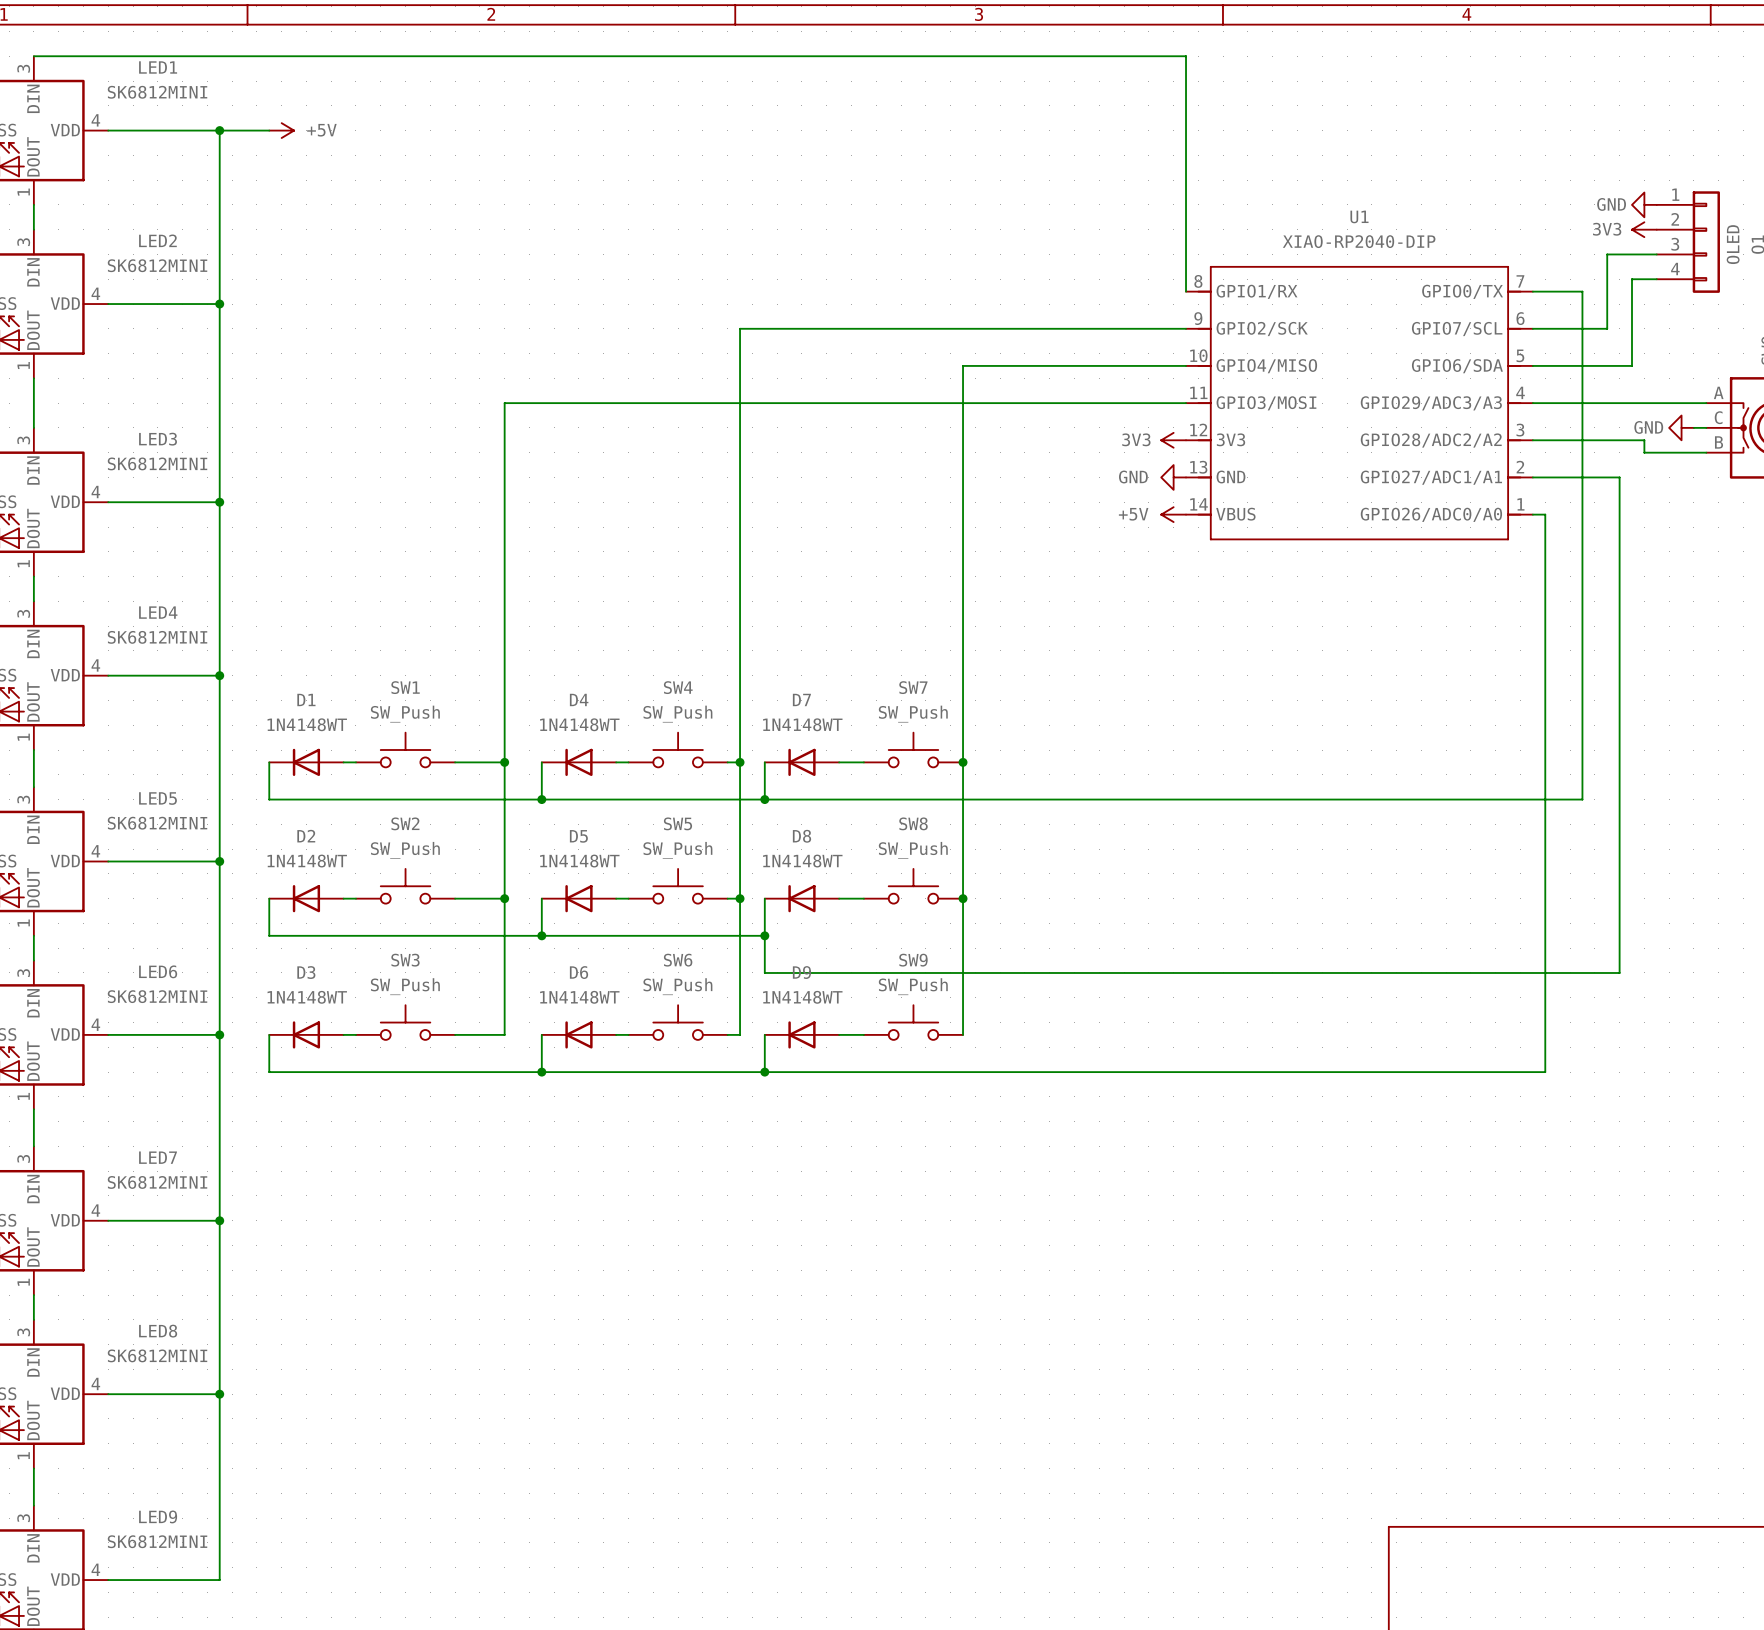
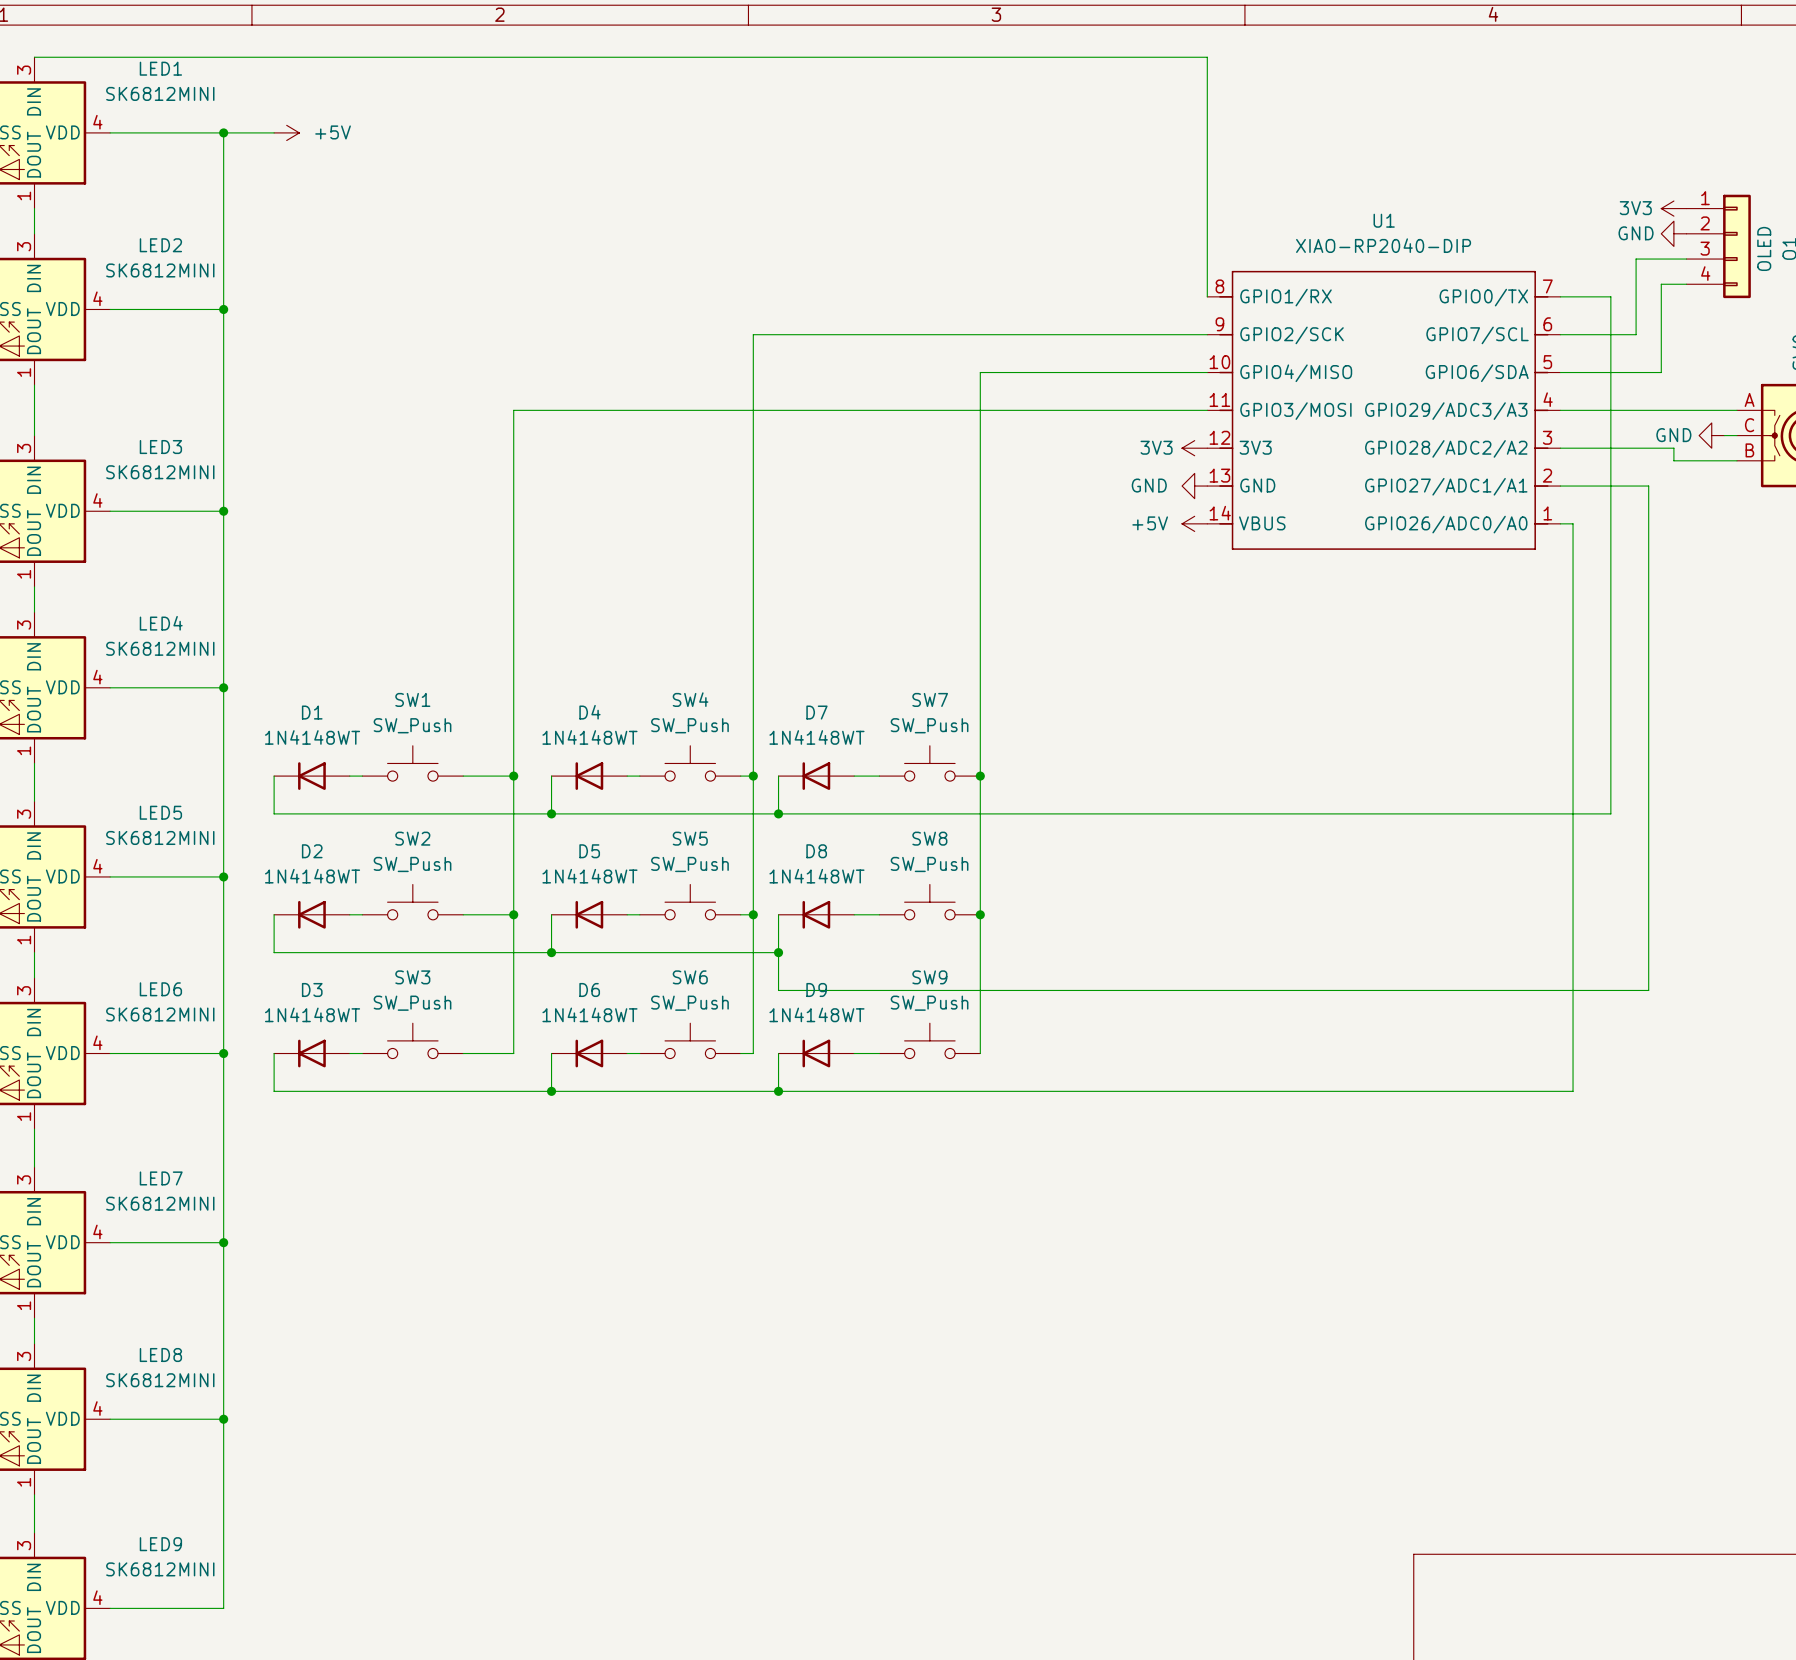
power symbol: GND (1644, 204) -> 3V3 (1673, 208)
power symbol: 3V3 (1644, 229) -> GND (1673, 233)

